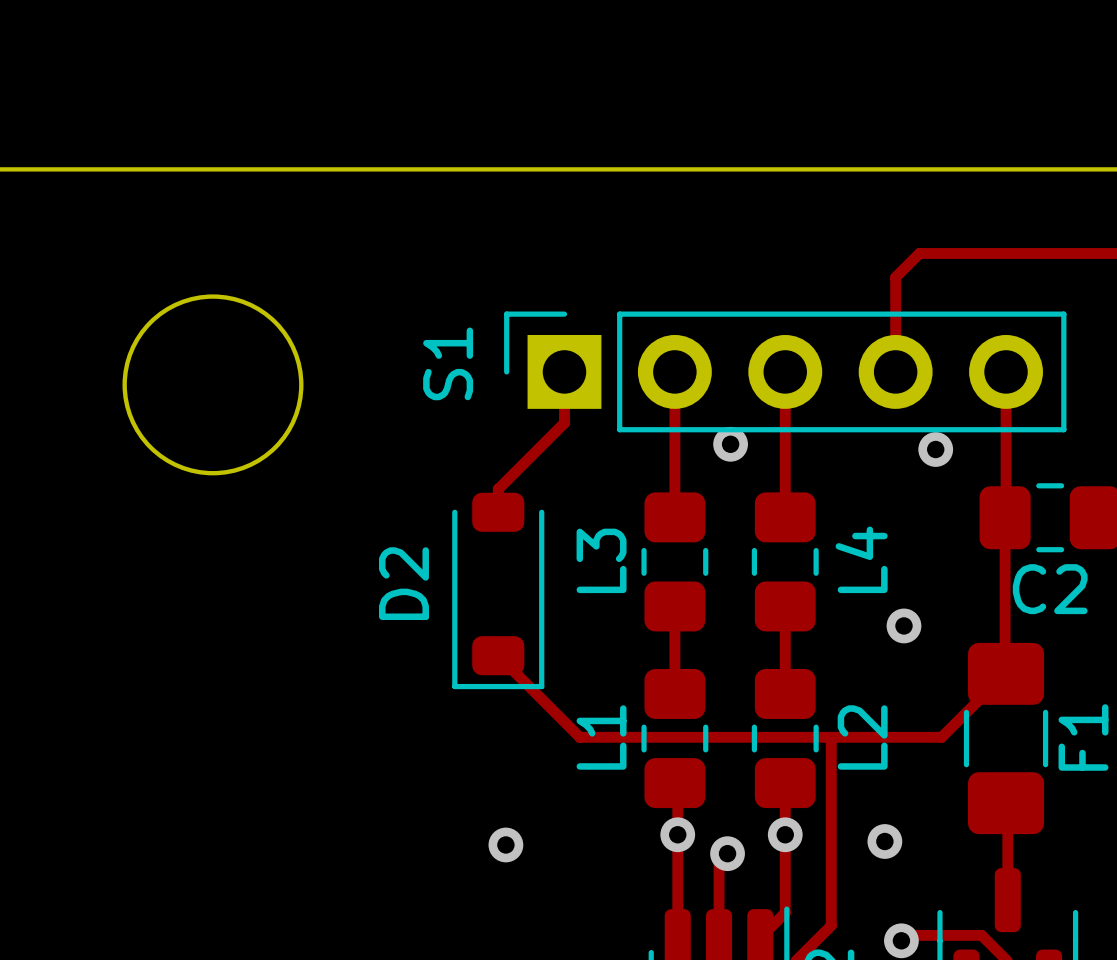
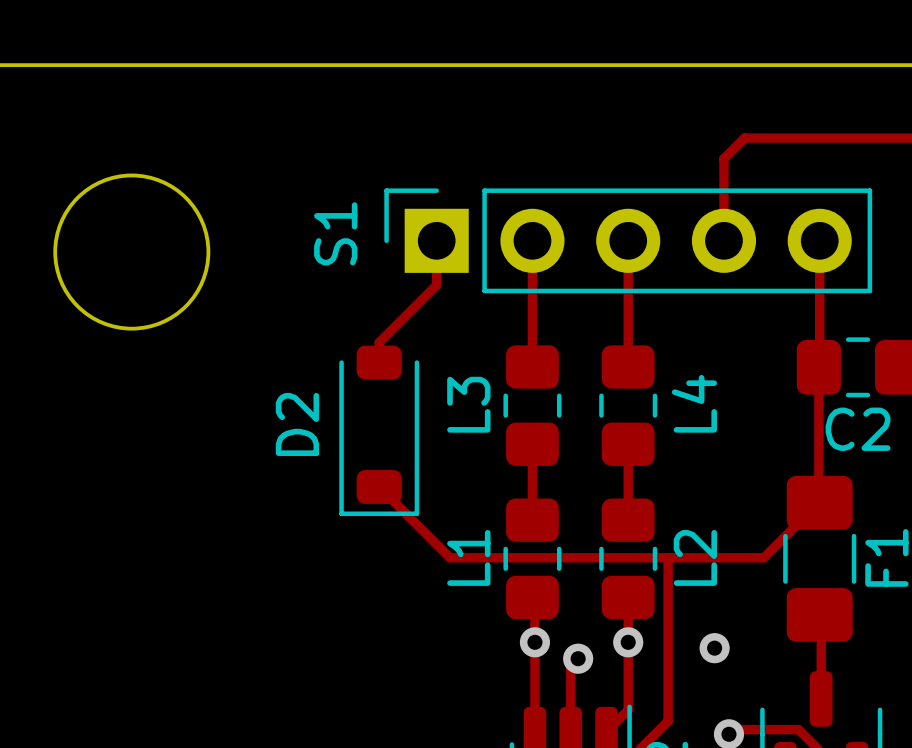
via: (730, 444) -> none
via: (935, 449) -> none
via: (903, 625) -> none
via: (505, 844) -> none

